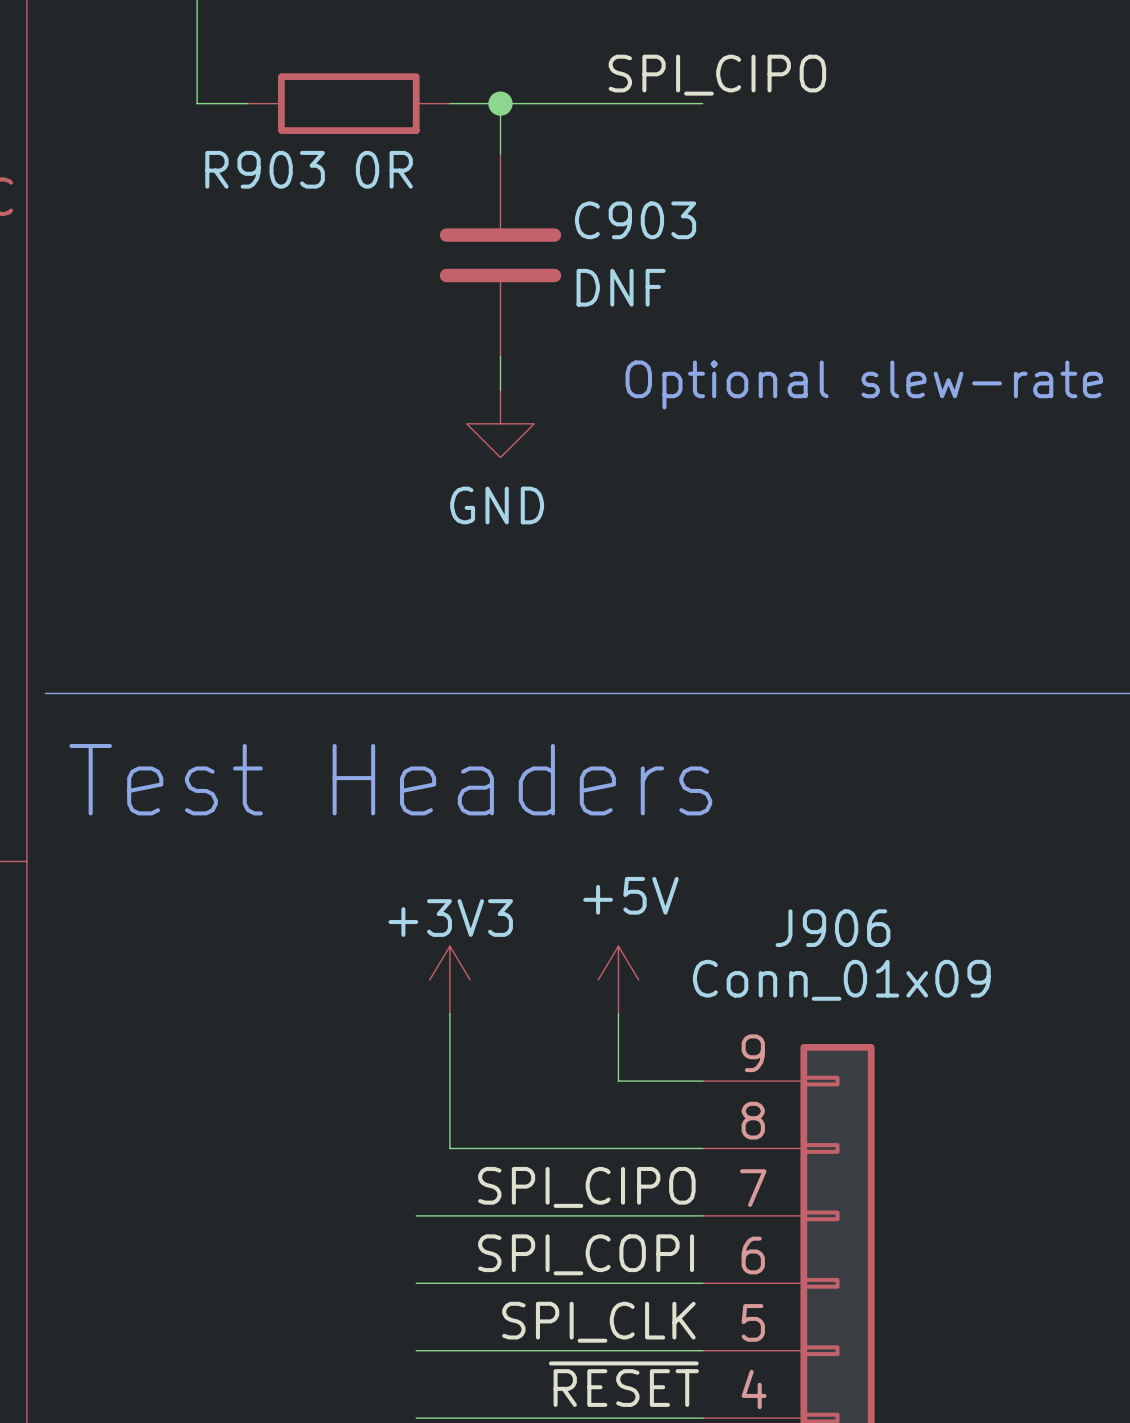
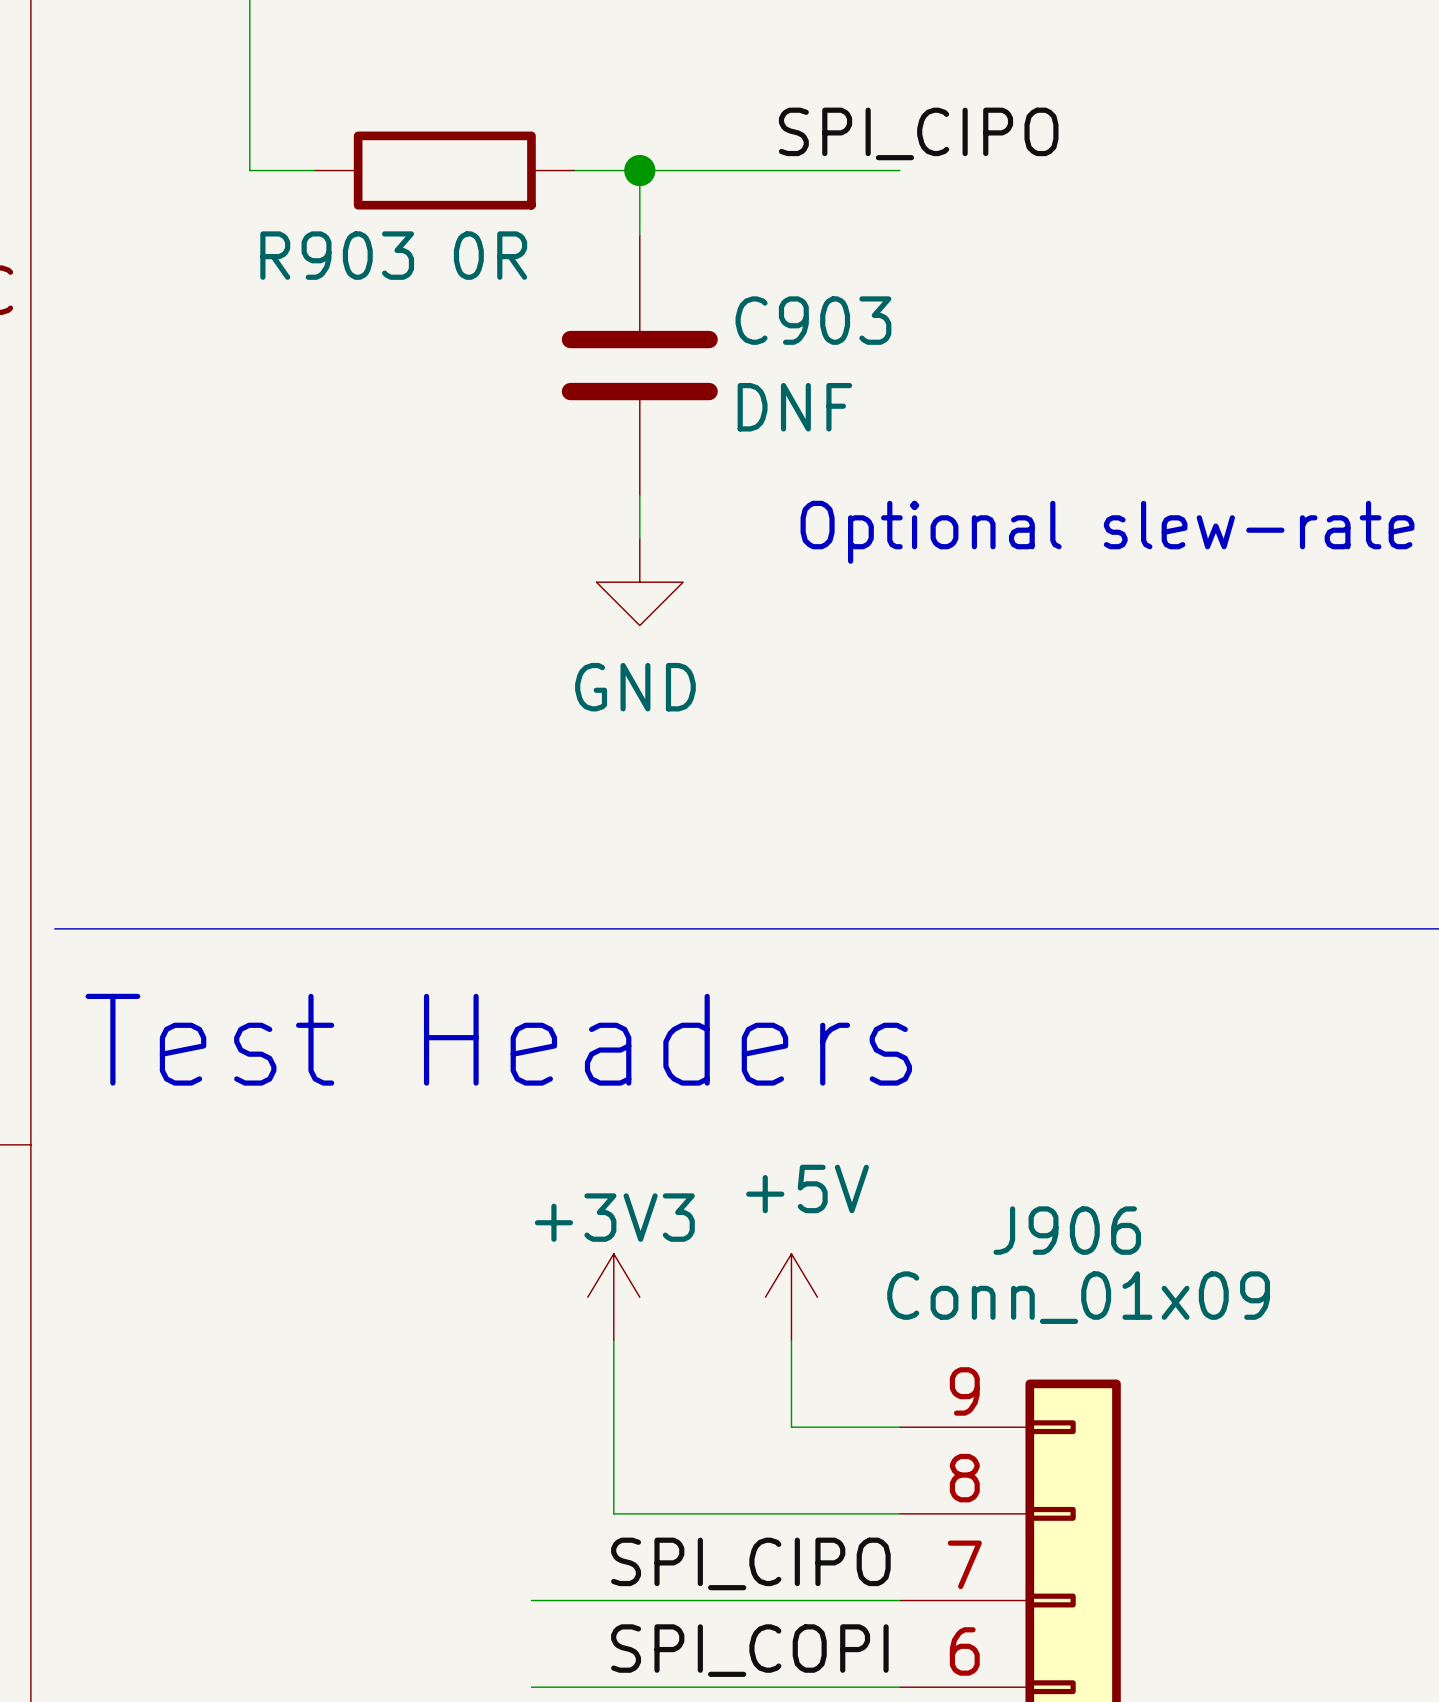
power symbol position: +3V3 (449, 979) -> +3V3 (613, 1297)
wire: (449, 1013) (449, 1148) (480, 1148) -> (613, 1340) (613, 1513)

